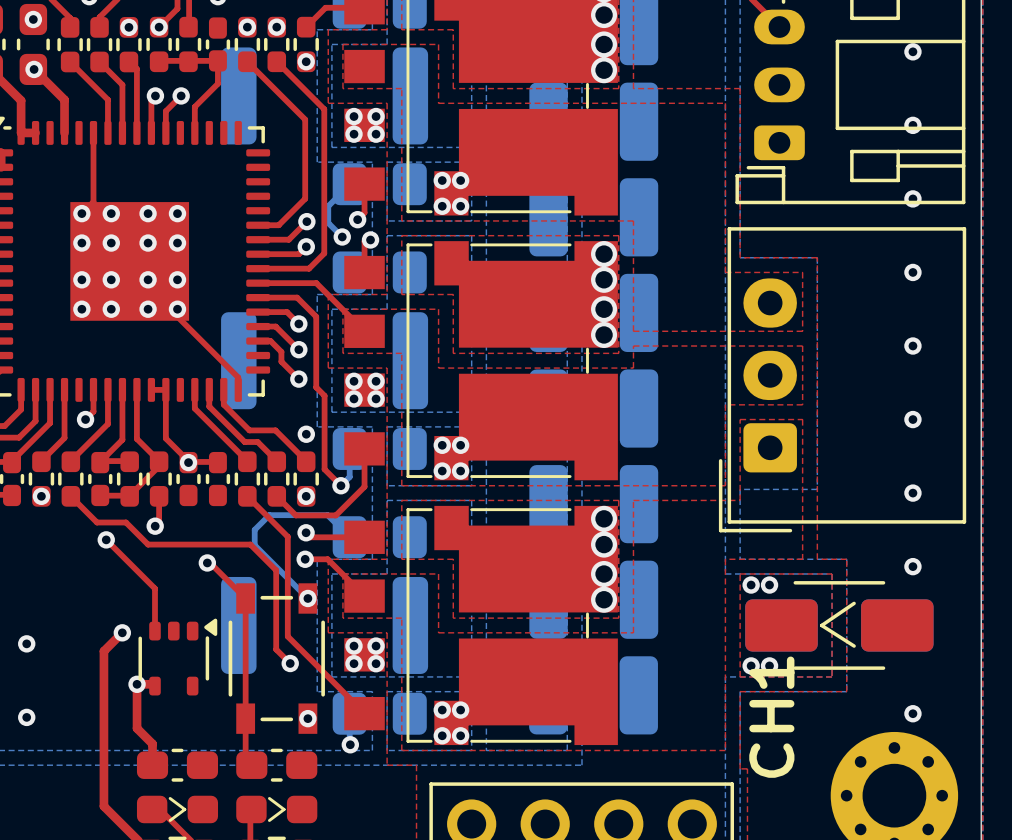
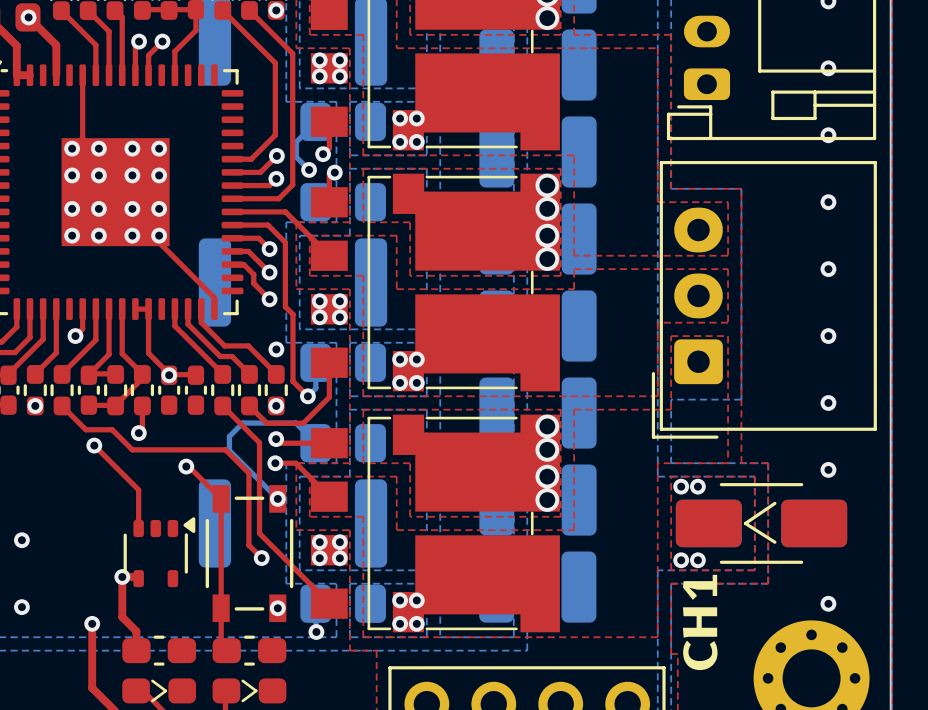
top track: (122, 632) (103, 651) (103, 735) -> none
via position: (122, 632) -> (92, 623)

